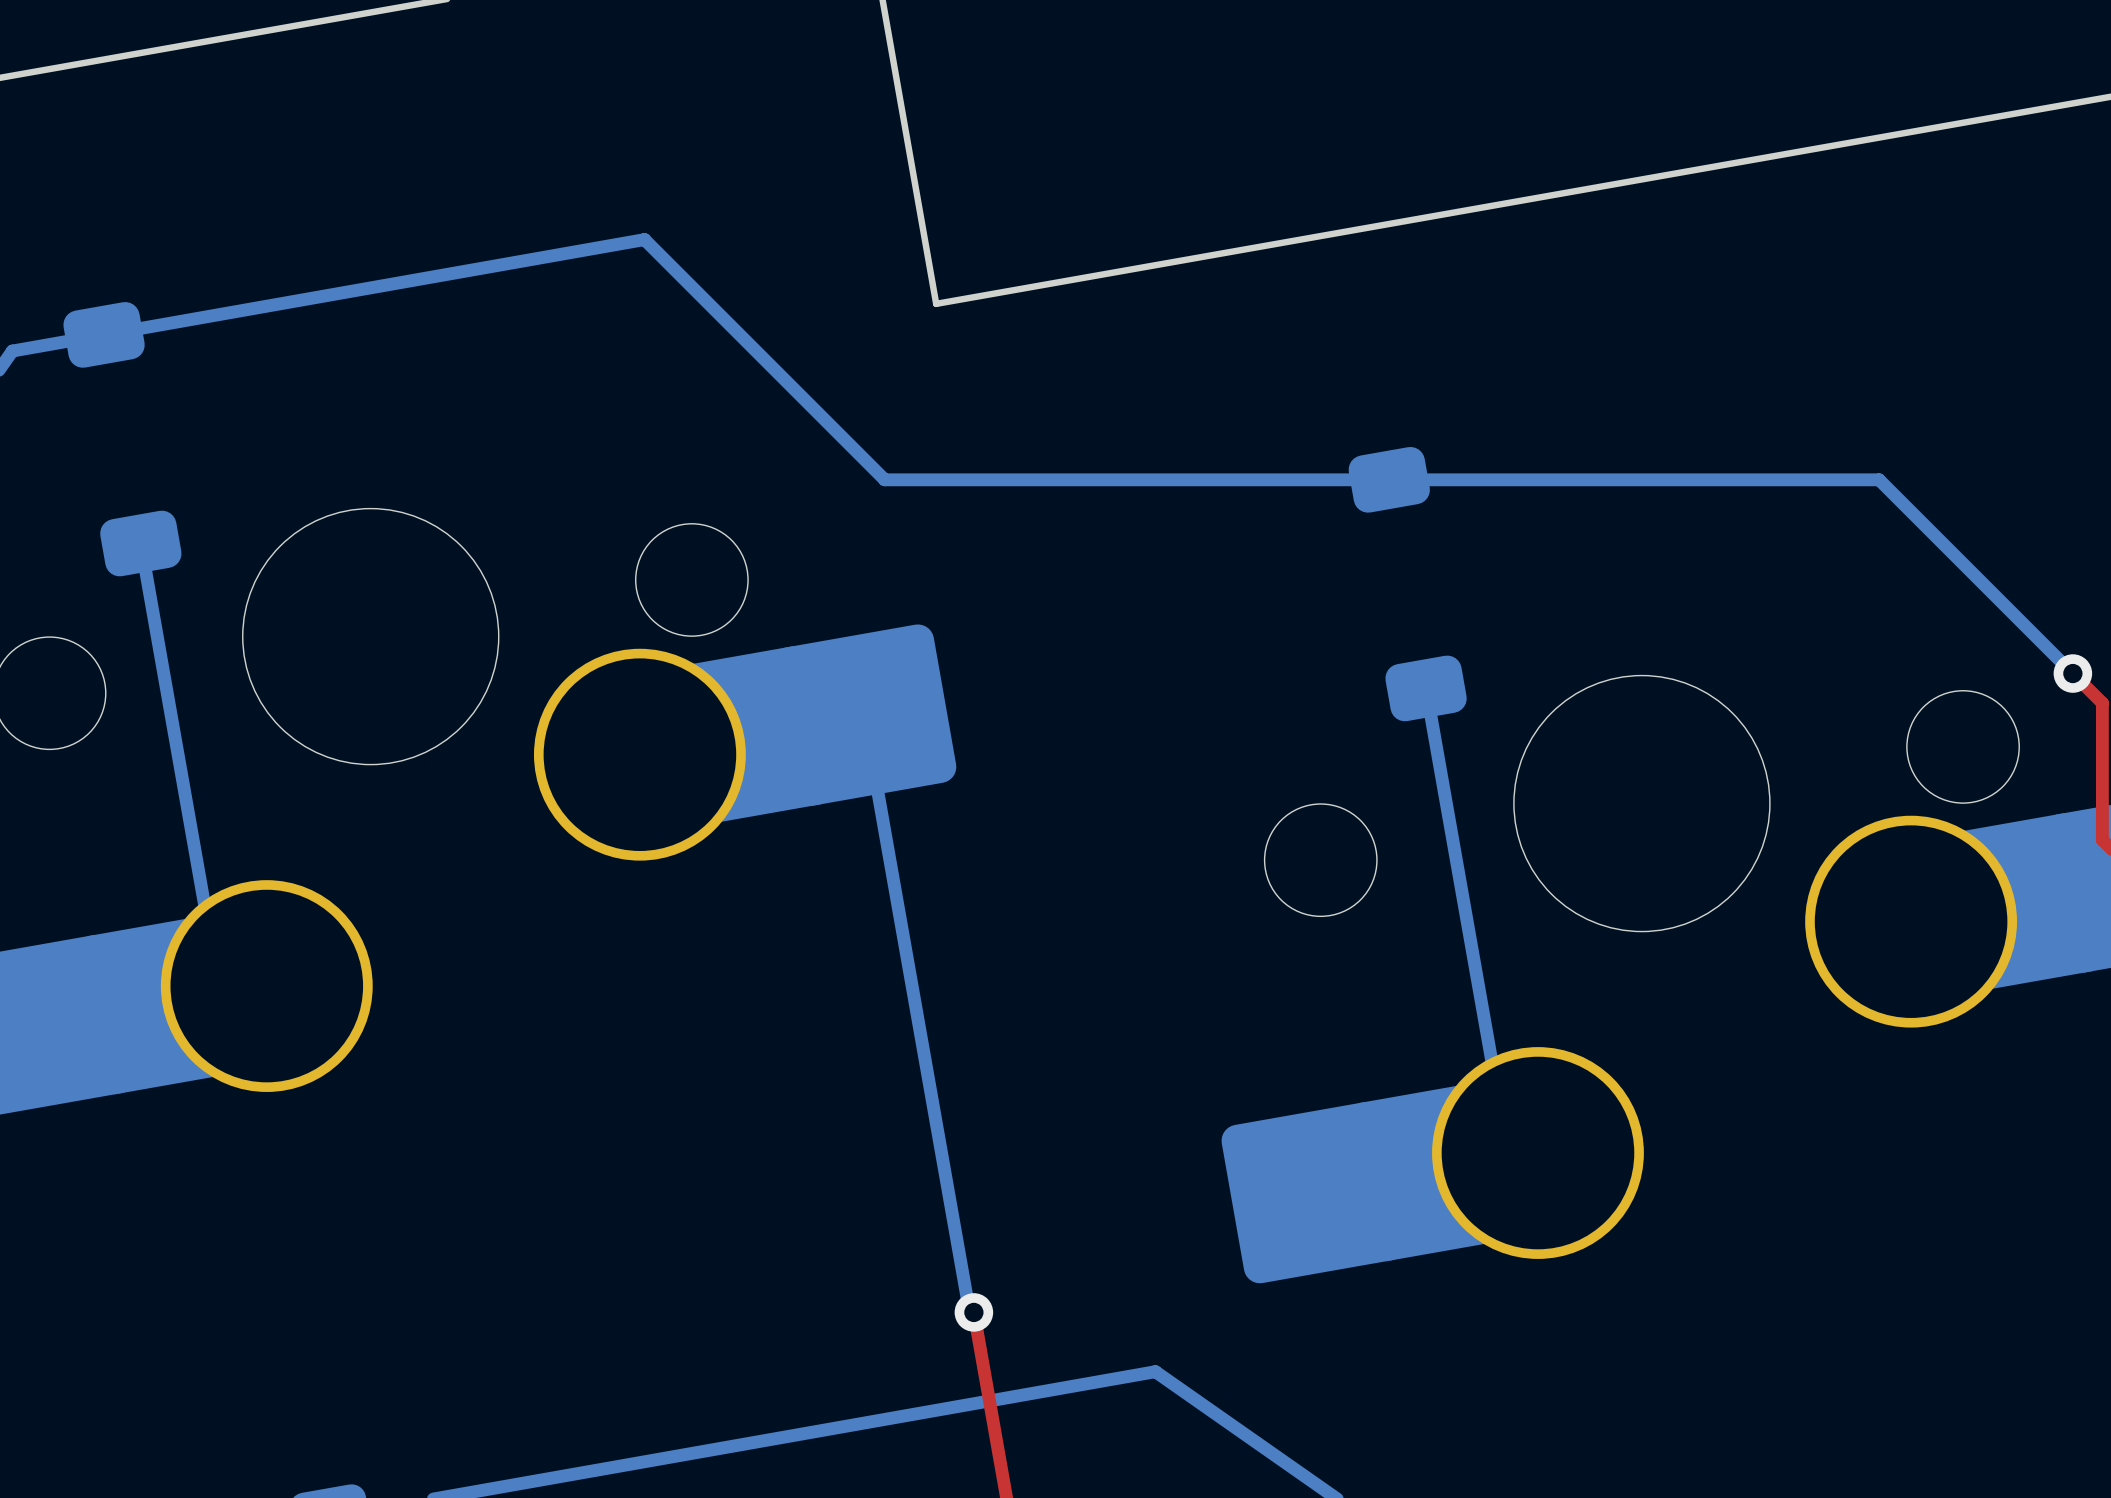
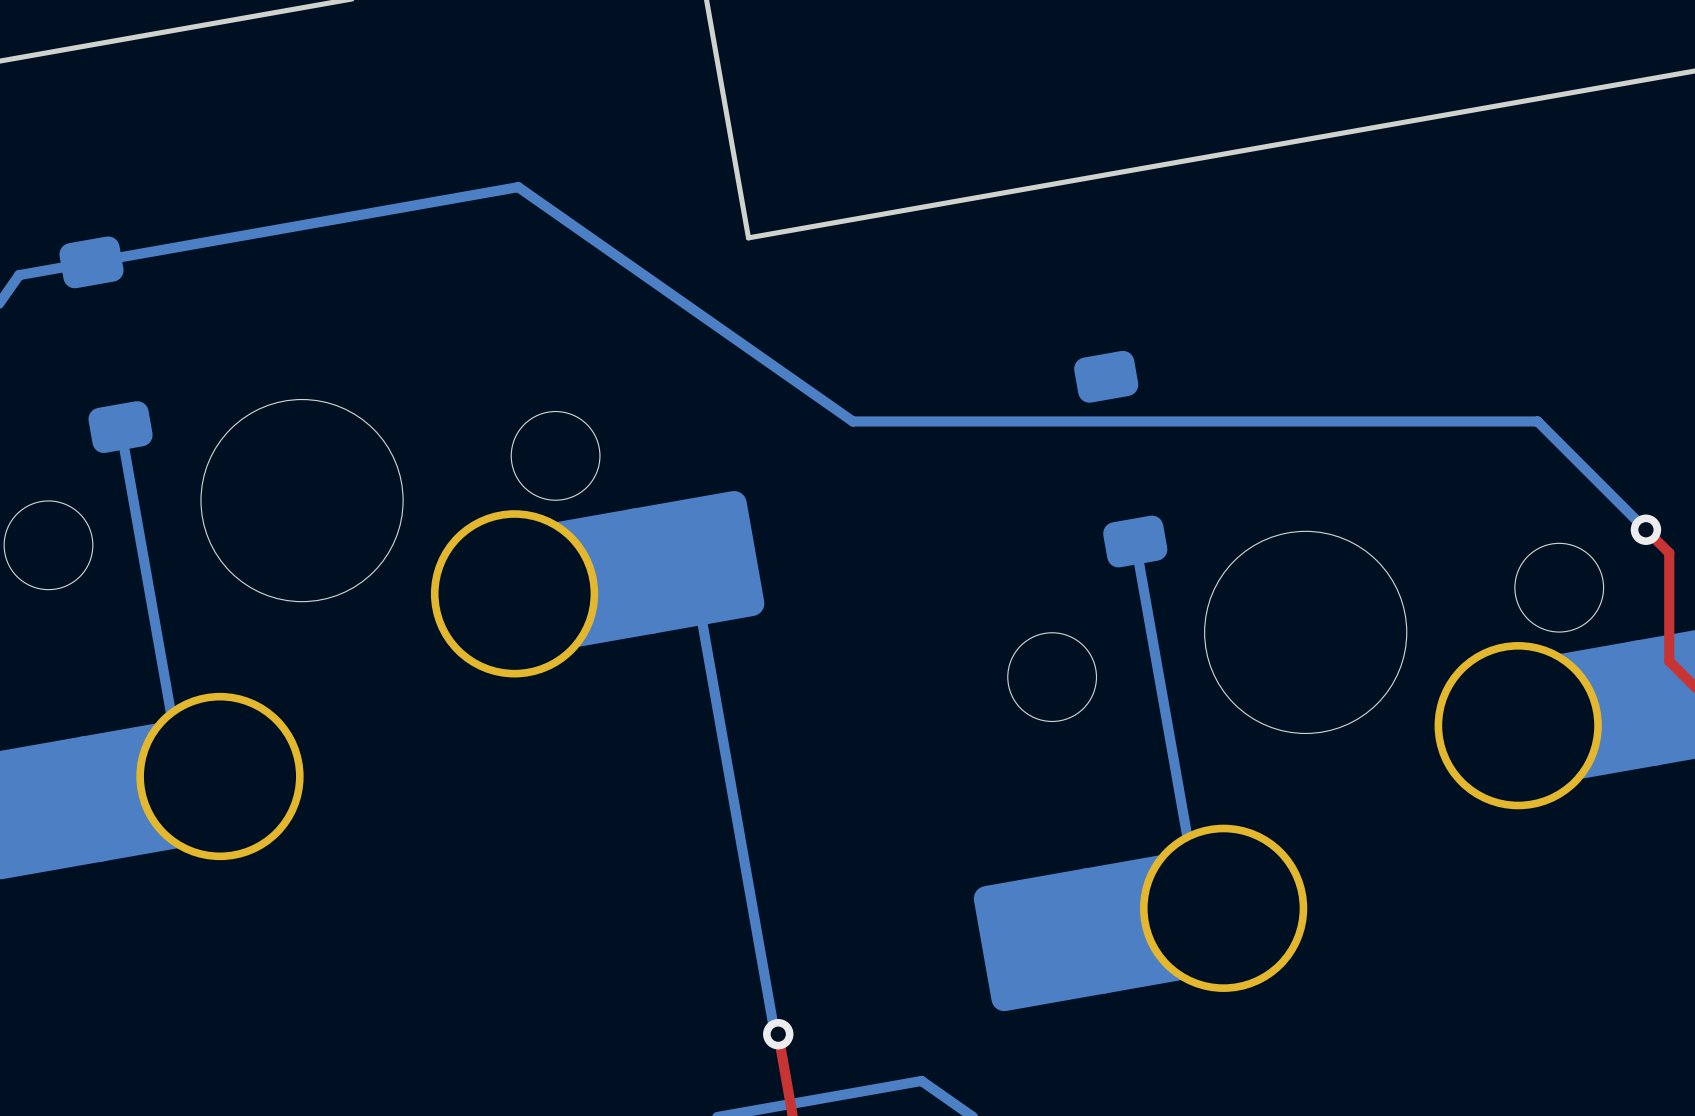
bottom track: (644, 239) (884, 479) (1879, 479) (1935, 536) -> (518, 187) (852, 421) (1537, 421)

